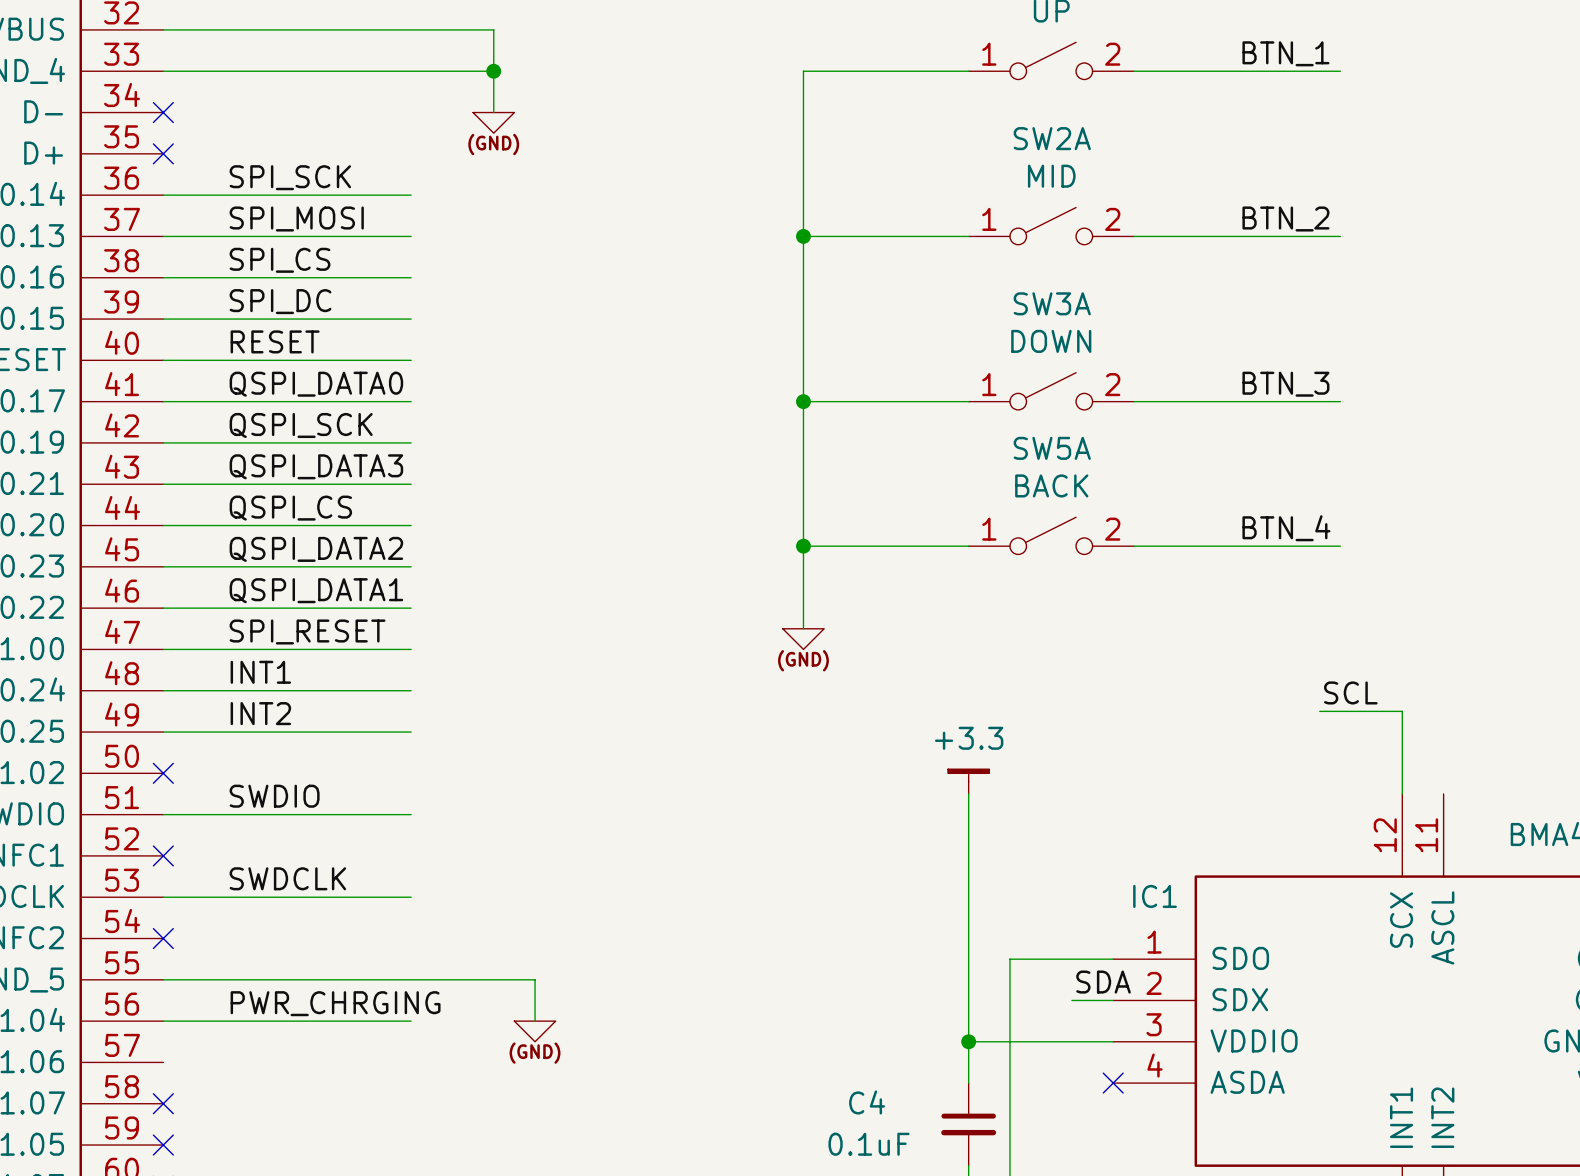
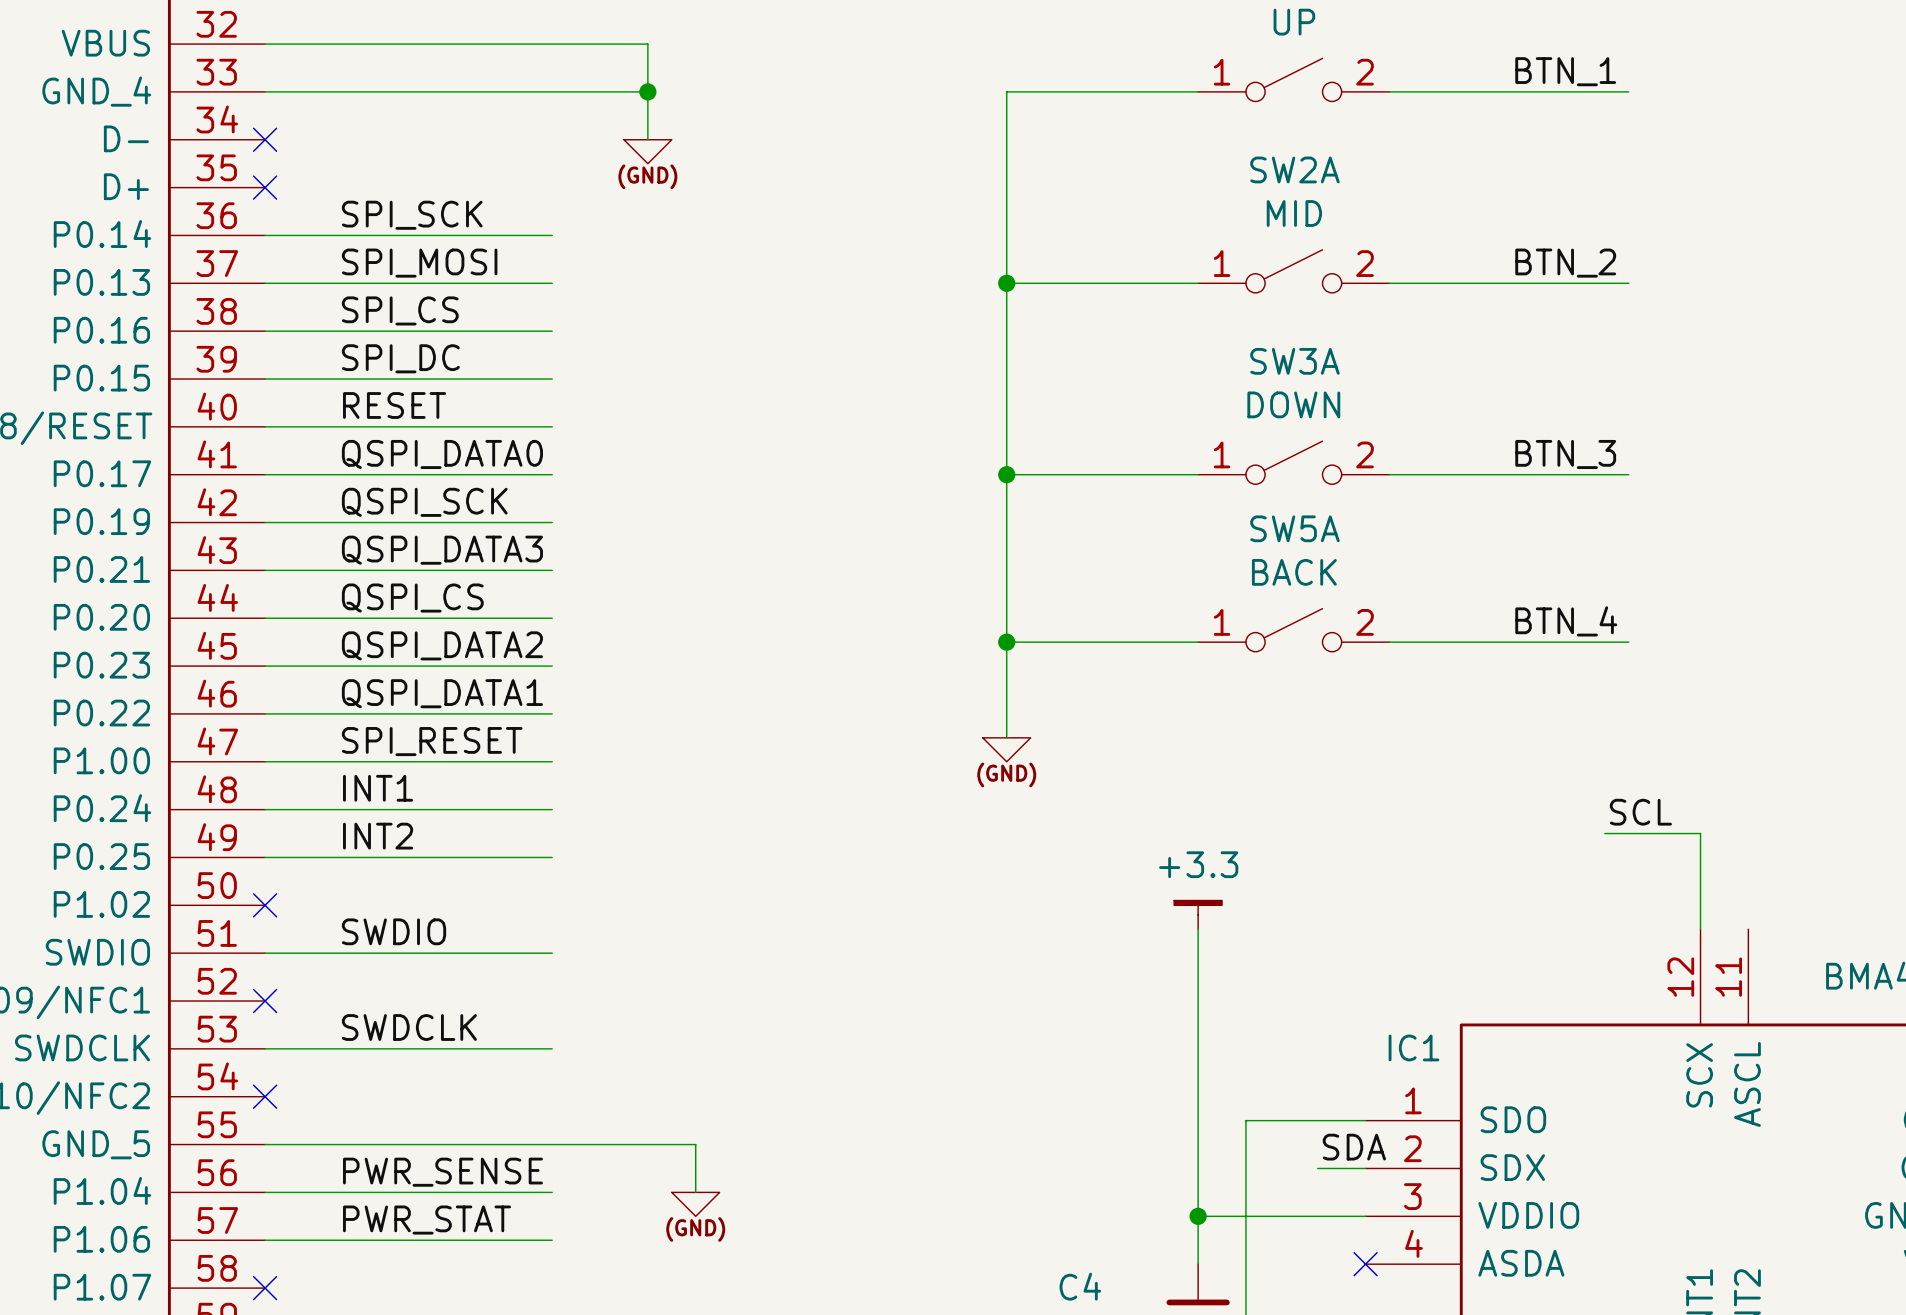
label: PWR_CHRGING (335, 1003) -> PWR_SENSE (442, 1172)
label: none -> PWR_STAT (427, 1220)
wire: none -> (265, 1240) (552, 1240)

